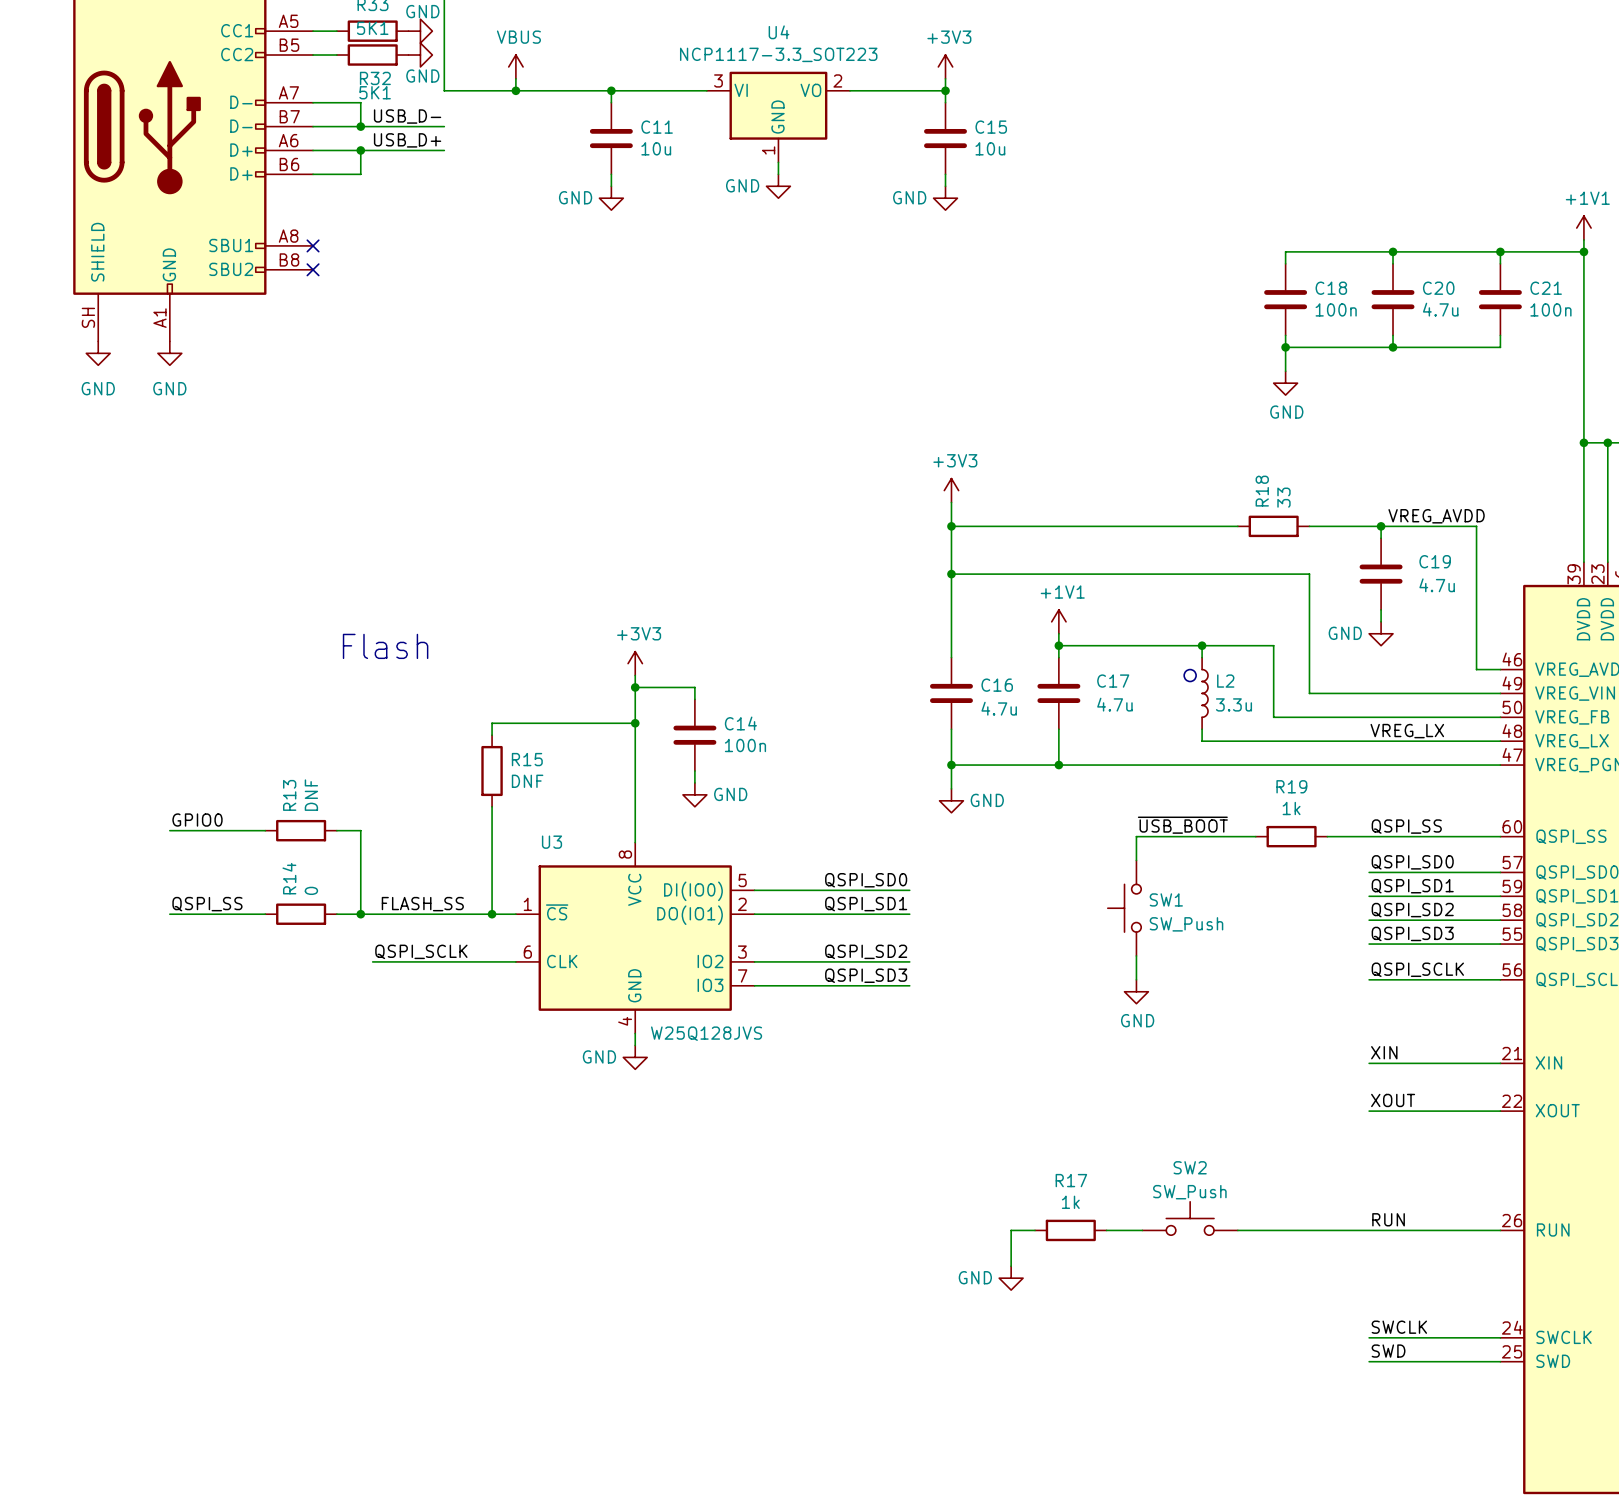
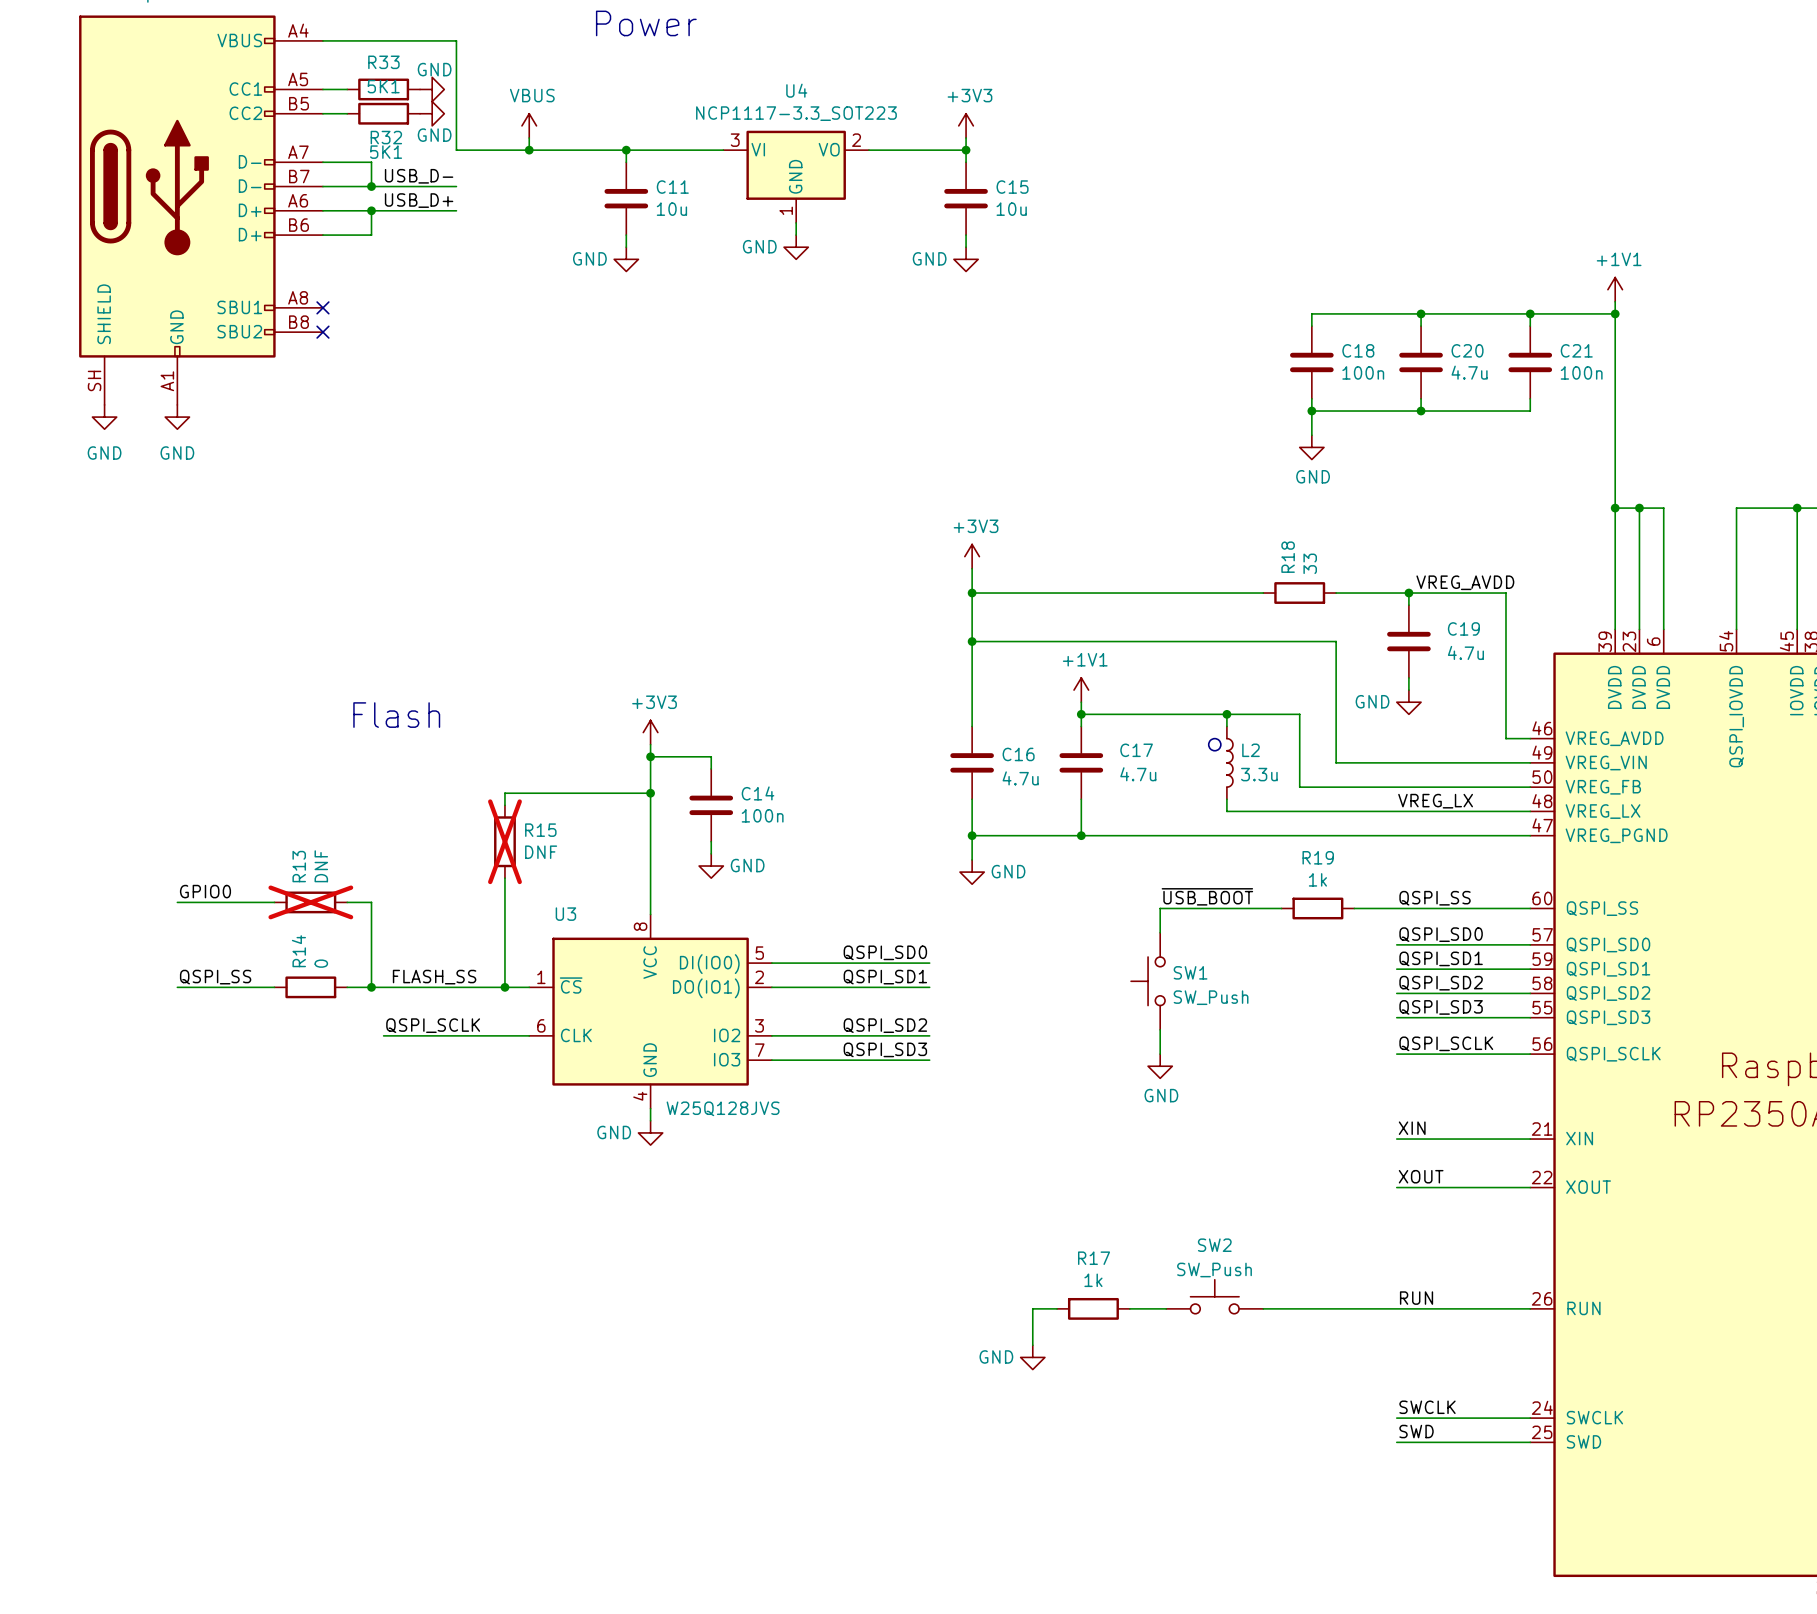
R15 do-not-place cross: none -> (504, 841)
R13 do-not-place cross: none -> (310, 902)

